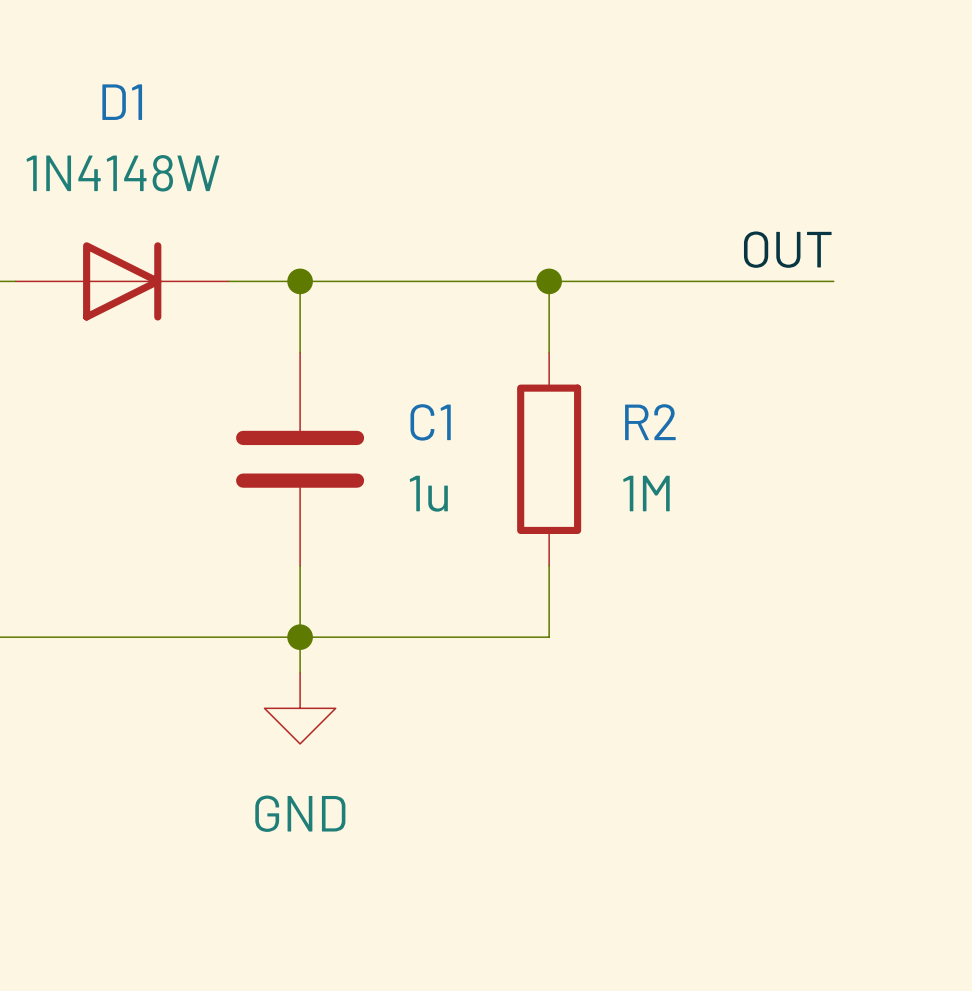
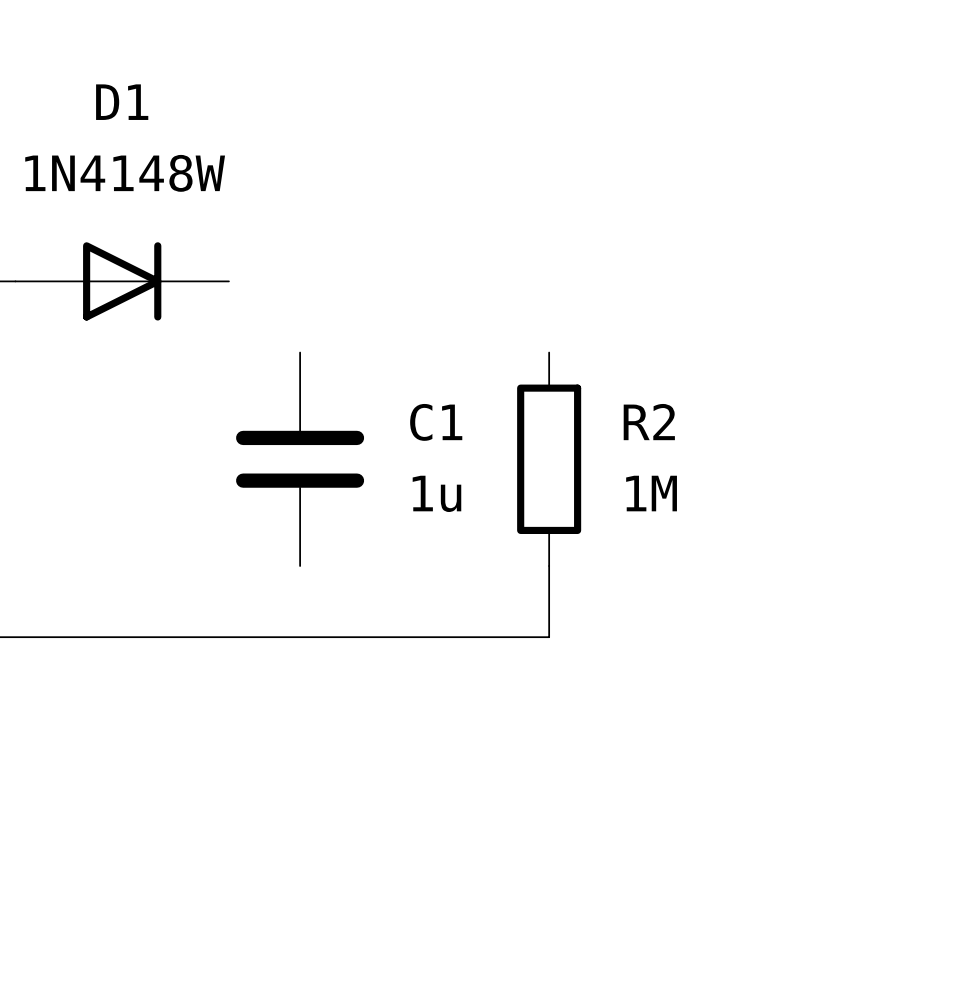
label: OUT (787, 249) -> none
wire: (228, 281) (833, 281) -> none
wire: (300, 281) (300, 352) -> none
junction: (300, 281) -> none
wire: (549, 281) (549, 352) -> none
junction: (549, 281) -> none
wire: (300, 566) (300, 672) -> none
junction: (300, 637) -> none
power symbol: GND (300, 708) -> none

